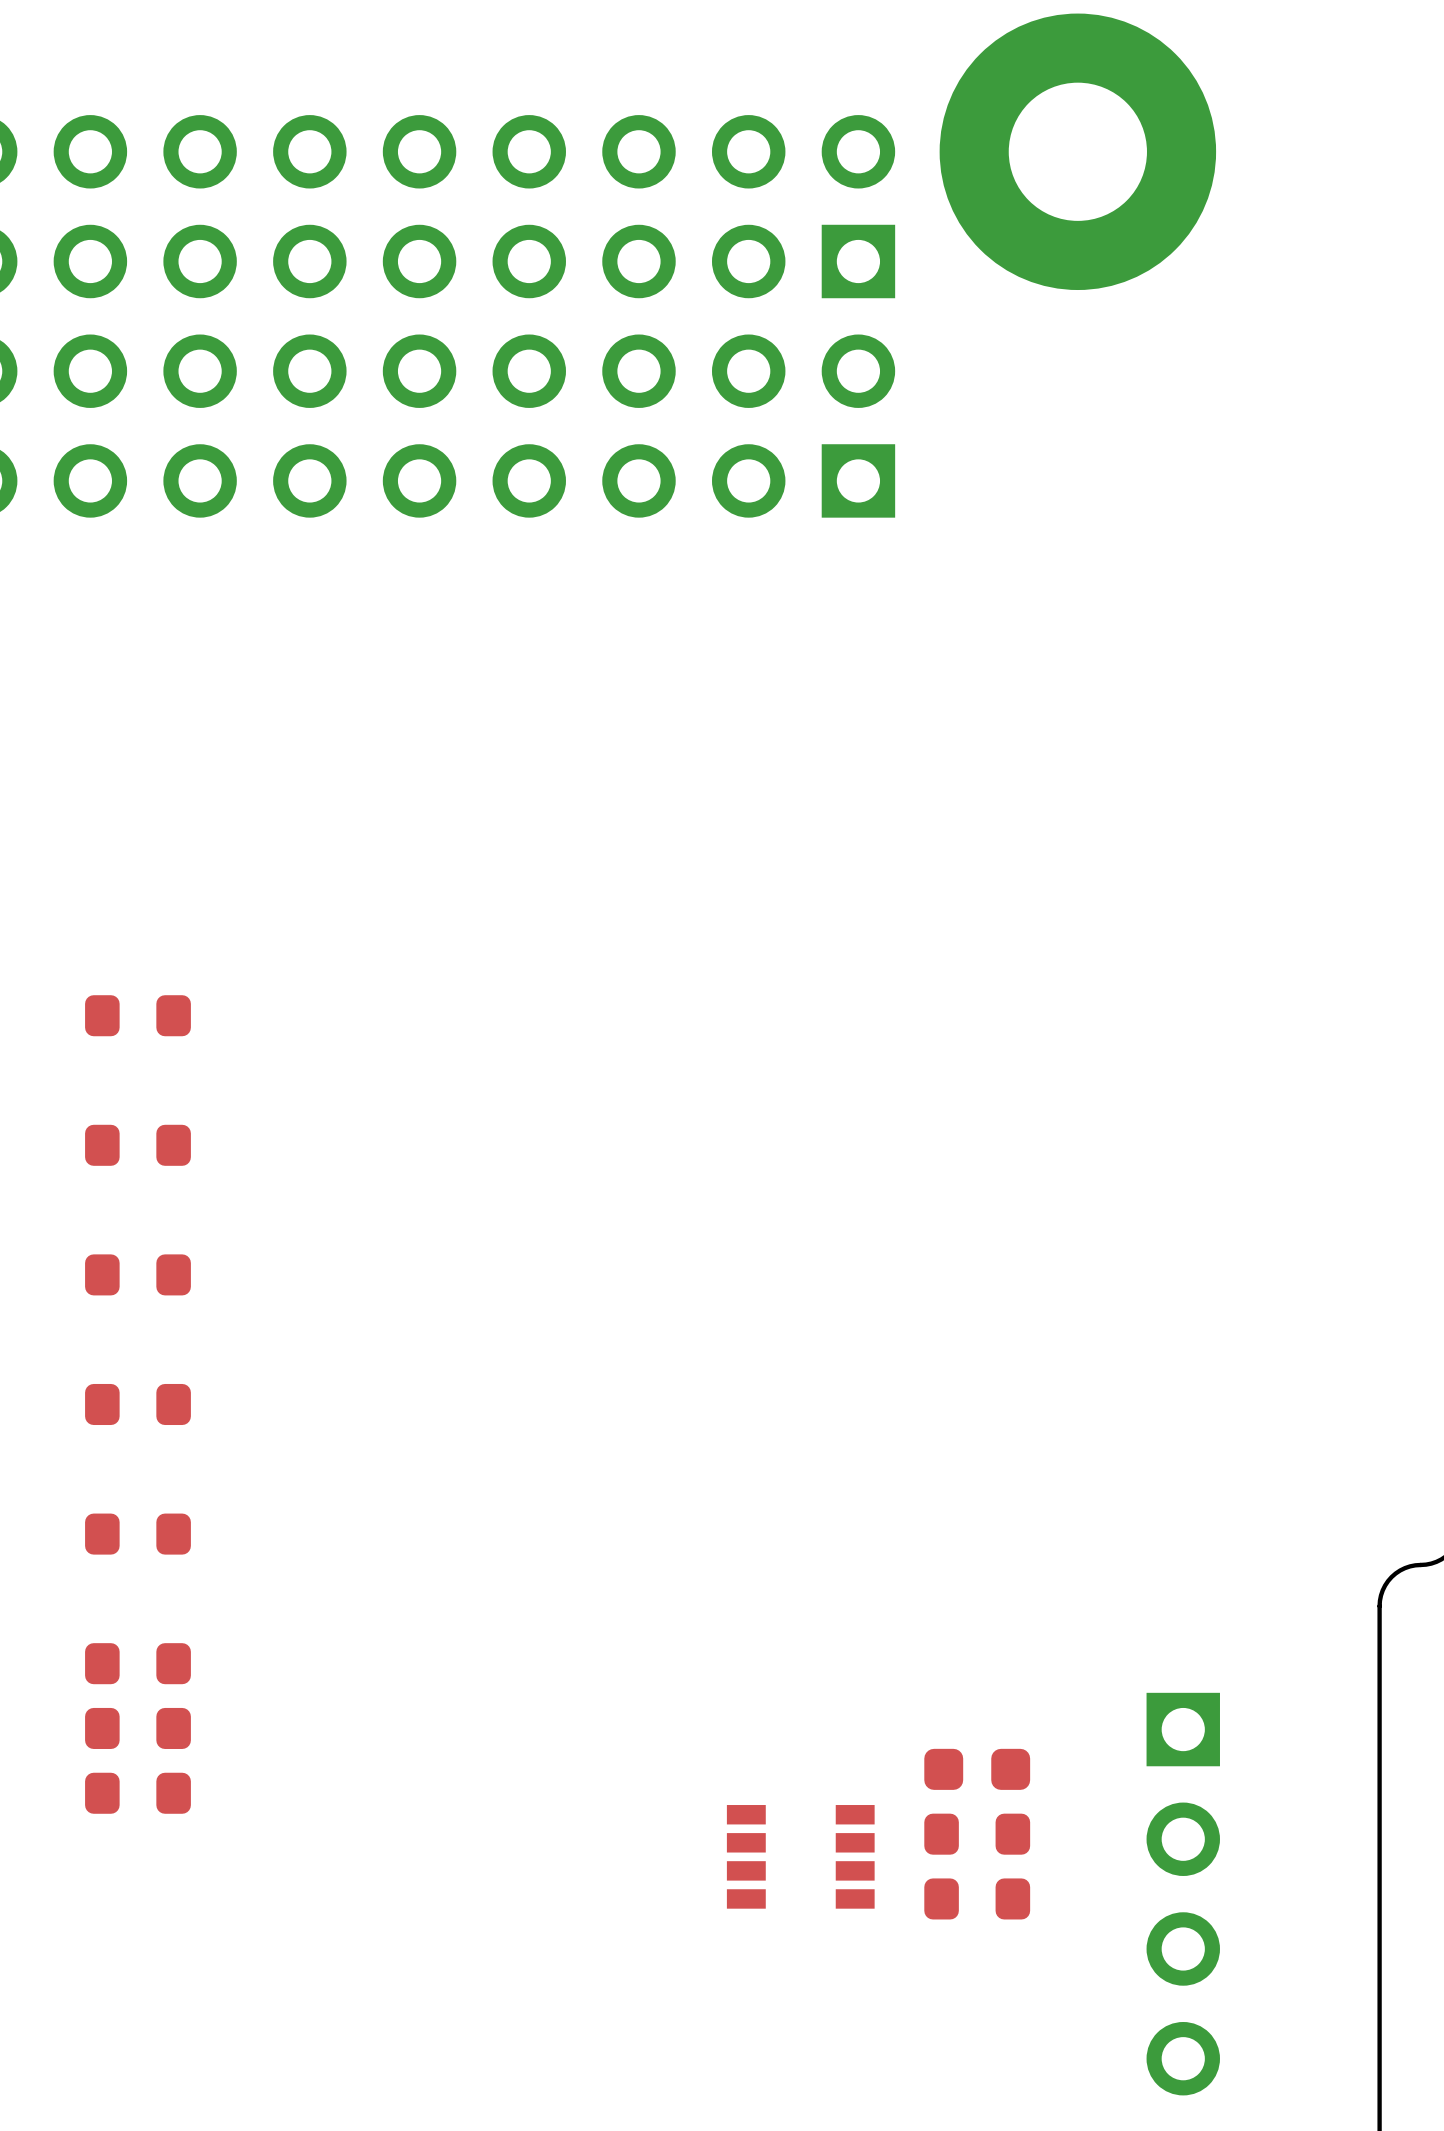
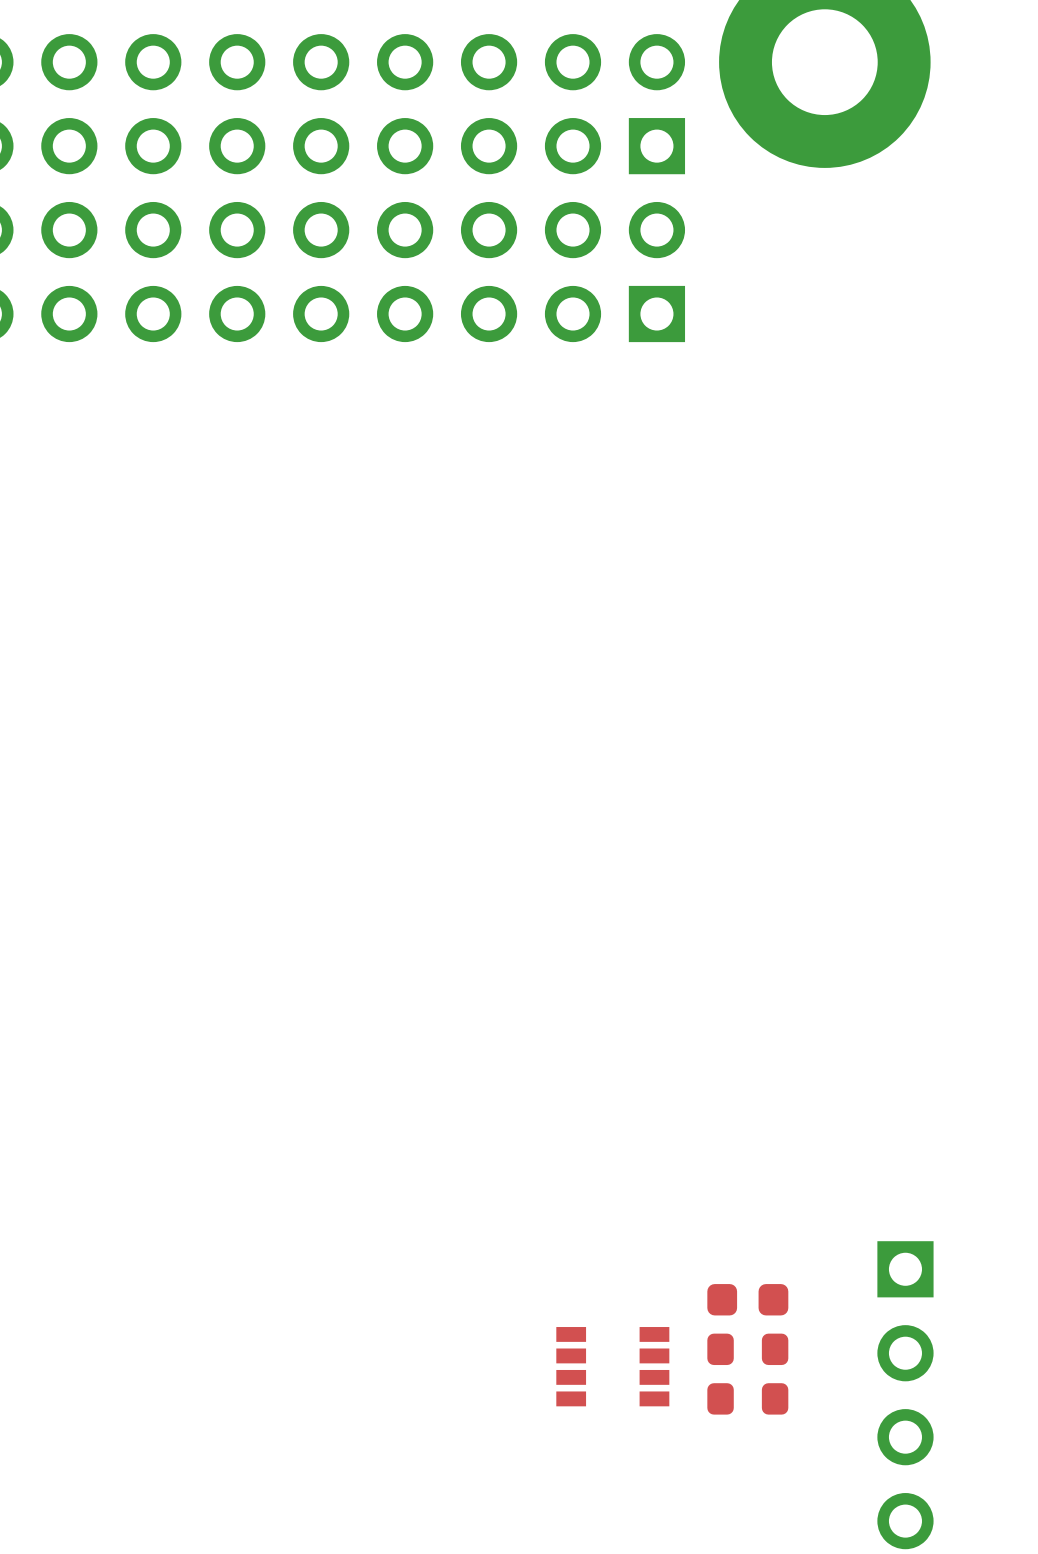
part: (137, 1015) -> none
part: (137, 1145) -> none
part: (137, 1274) -> none
part: (137, 1404) -> none
part: (137, 1534) -> none
part: (137, 1663) -> none
part: (137, 1728) -> none
part: (137, 1793) -> none

